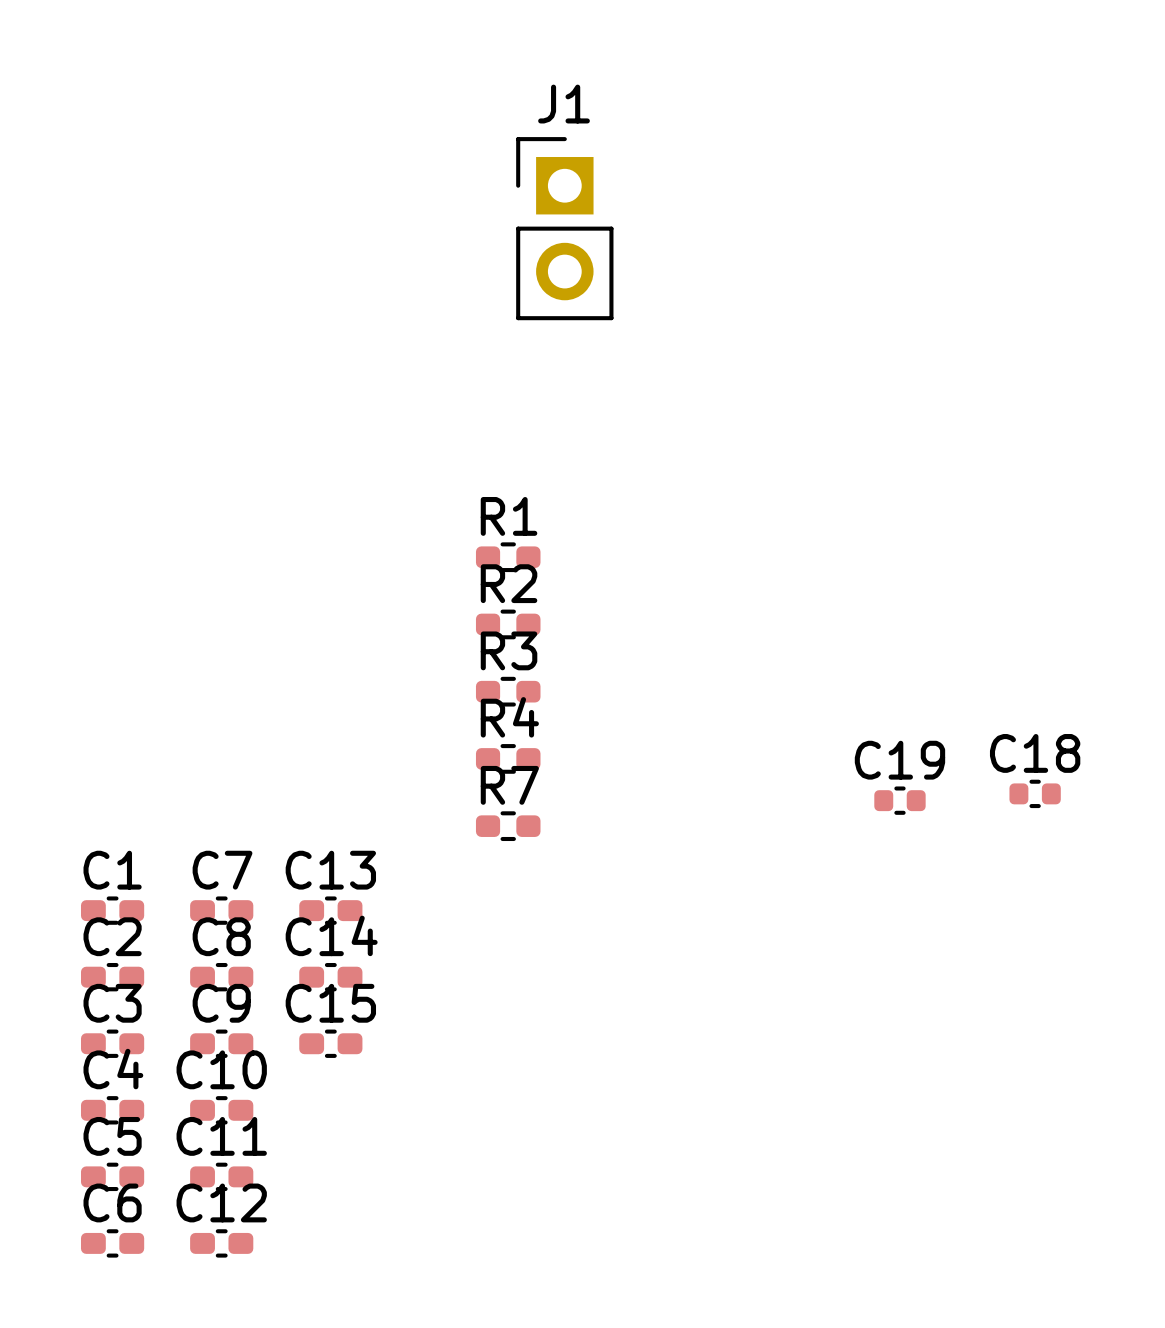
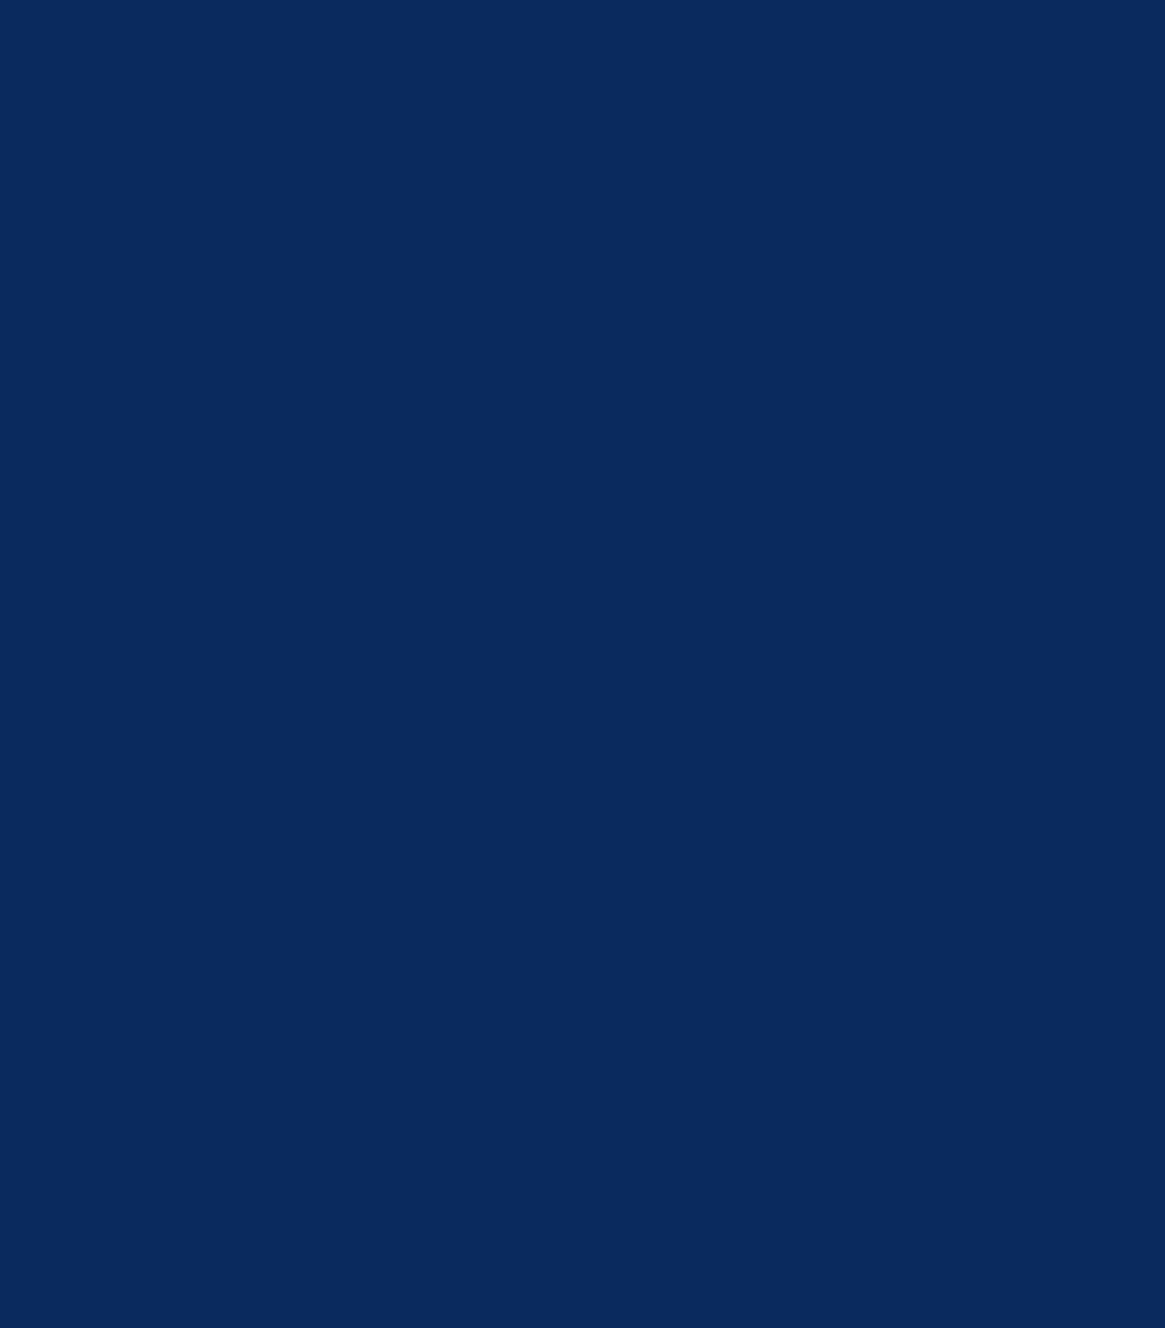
J1: (564, 228) -> none
R1: (508, 557) -> none
R2: (508, 624) -> none
R3: (508, 691) -> none
R4: (508, 758) -> none
C18: (1035, 793) -> none
C19: (899, 800) -> none
R7: (508, 826) -> none
C1: (112, 910) -> none
C7: (221, 910) -> none
C13: (330, 910) -> none
C2: (112, 977) -> none
C8: (221, 977) -> none
C14: (330, 977) -> none
C3: (112, 1043) -> none
C9: (221, 1043) -> none
C15: (330, 1043) -> none
C4: (112, 1110) -> none
C10: (221, 1110) -> none
C5: (112, 1176) -> none
C11: (221, 1176) -> none
C6: (112, 1243) -> none
C12: (221, 1243) -> none

